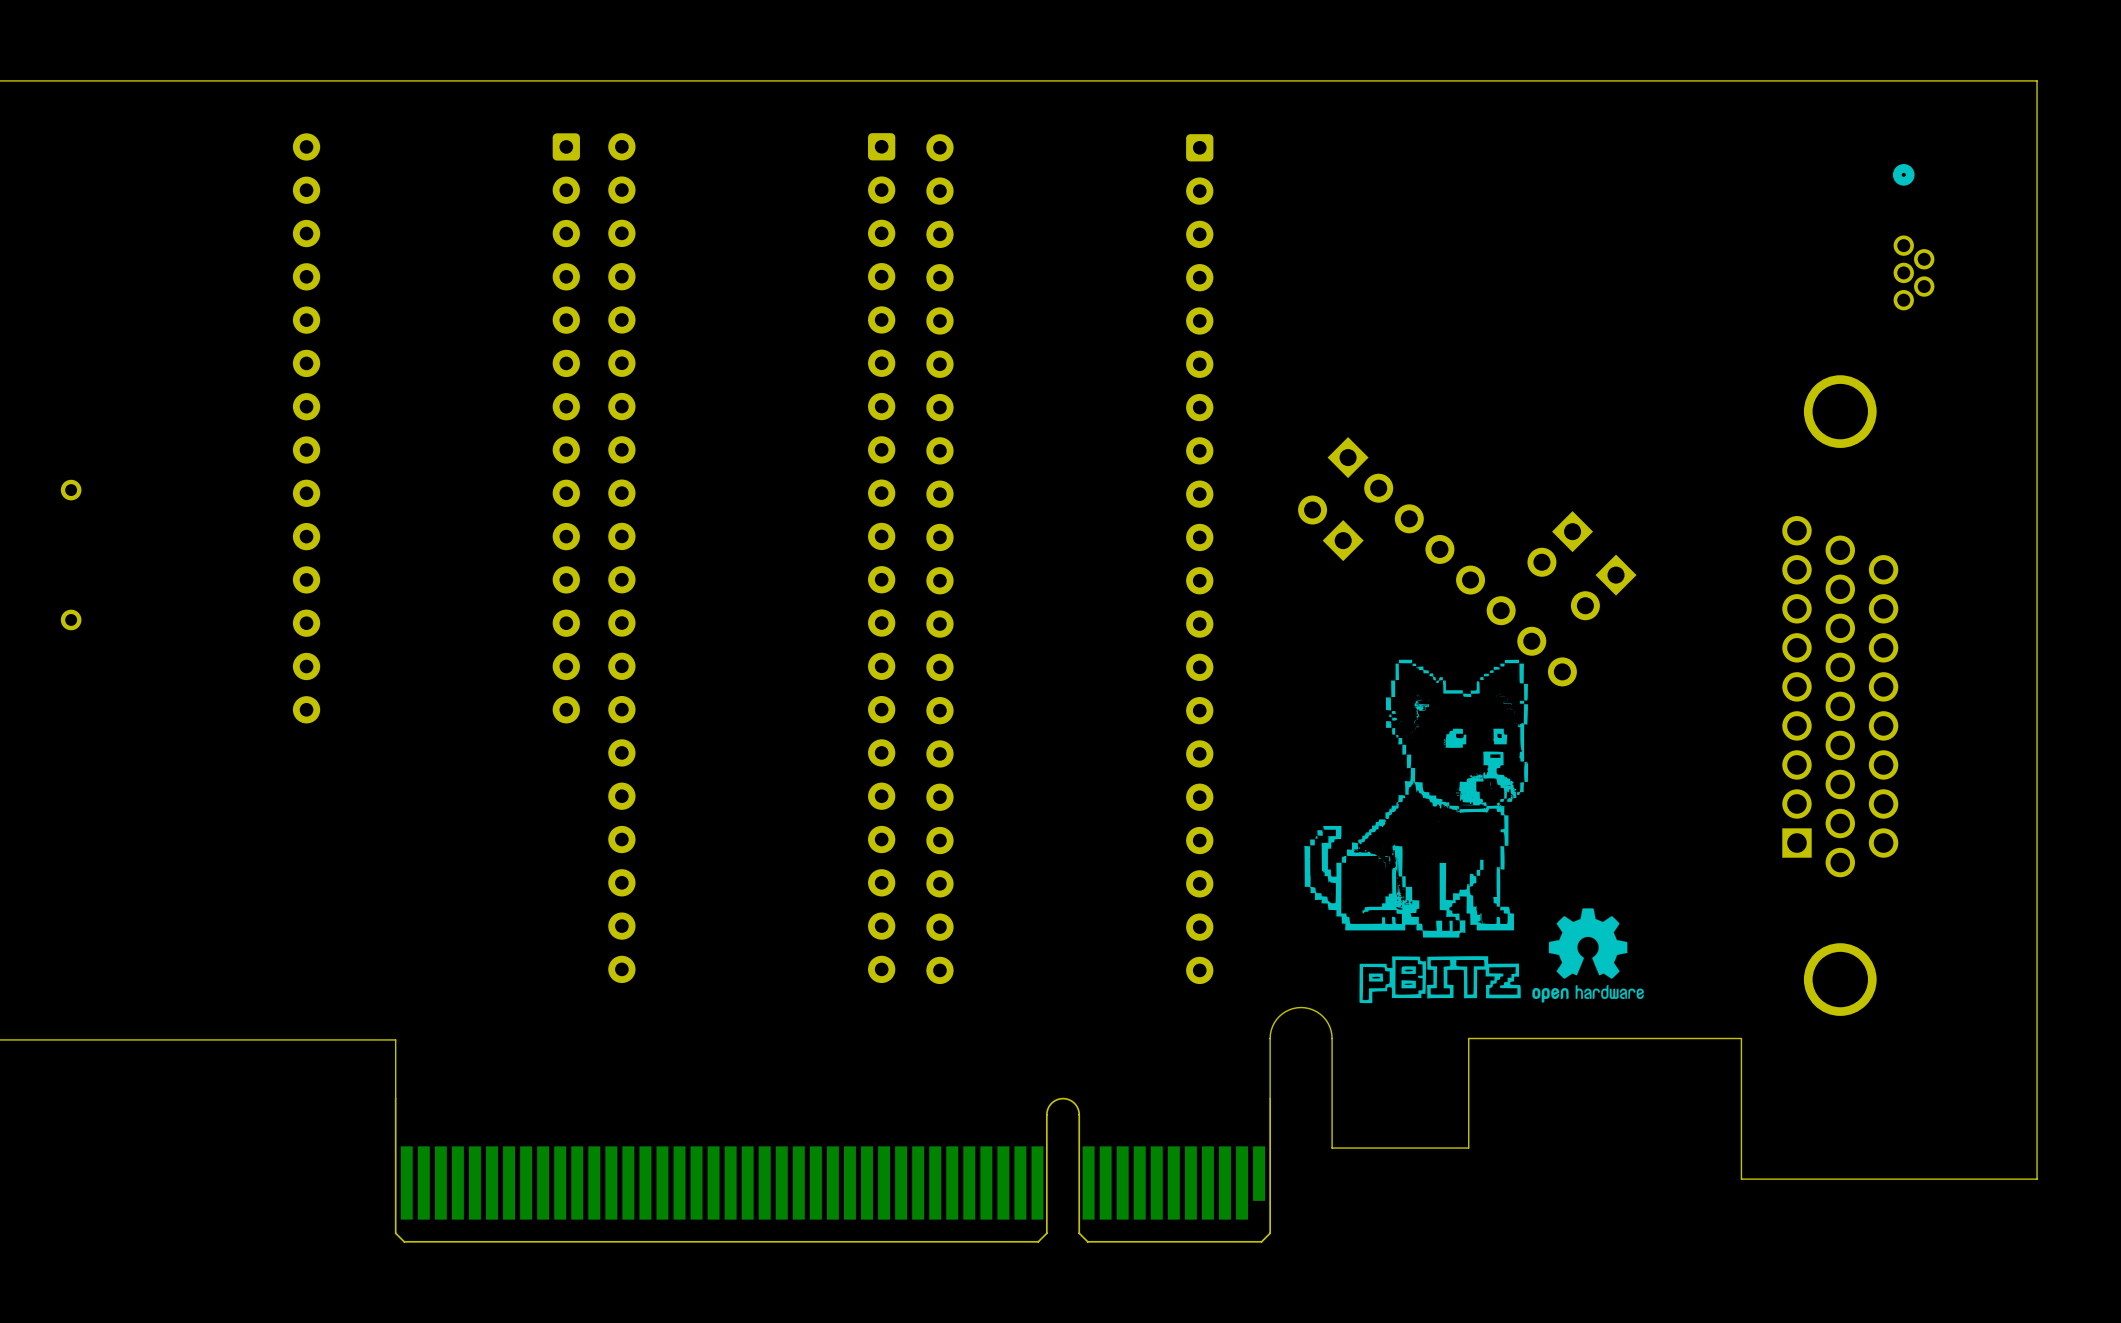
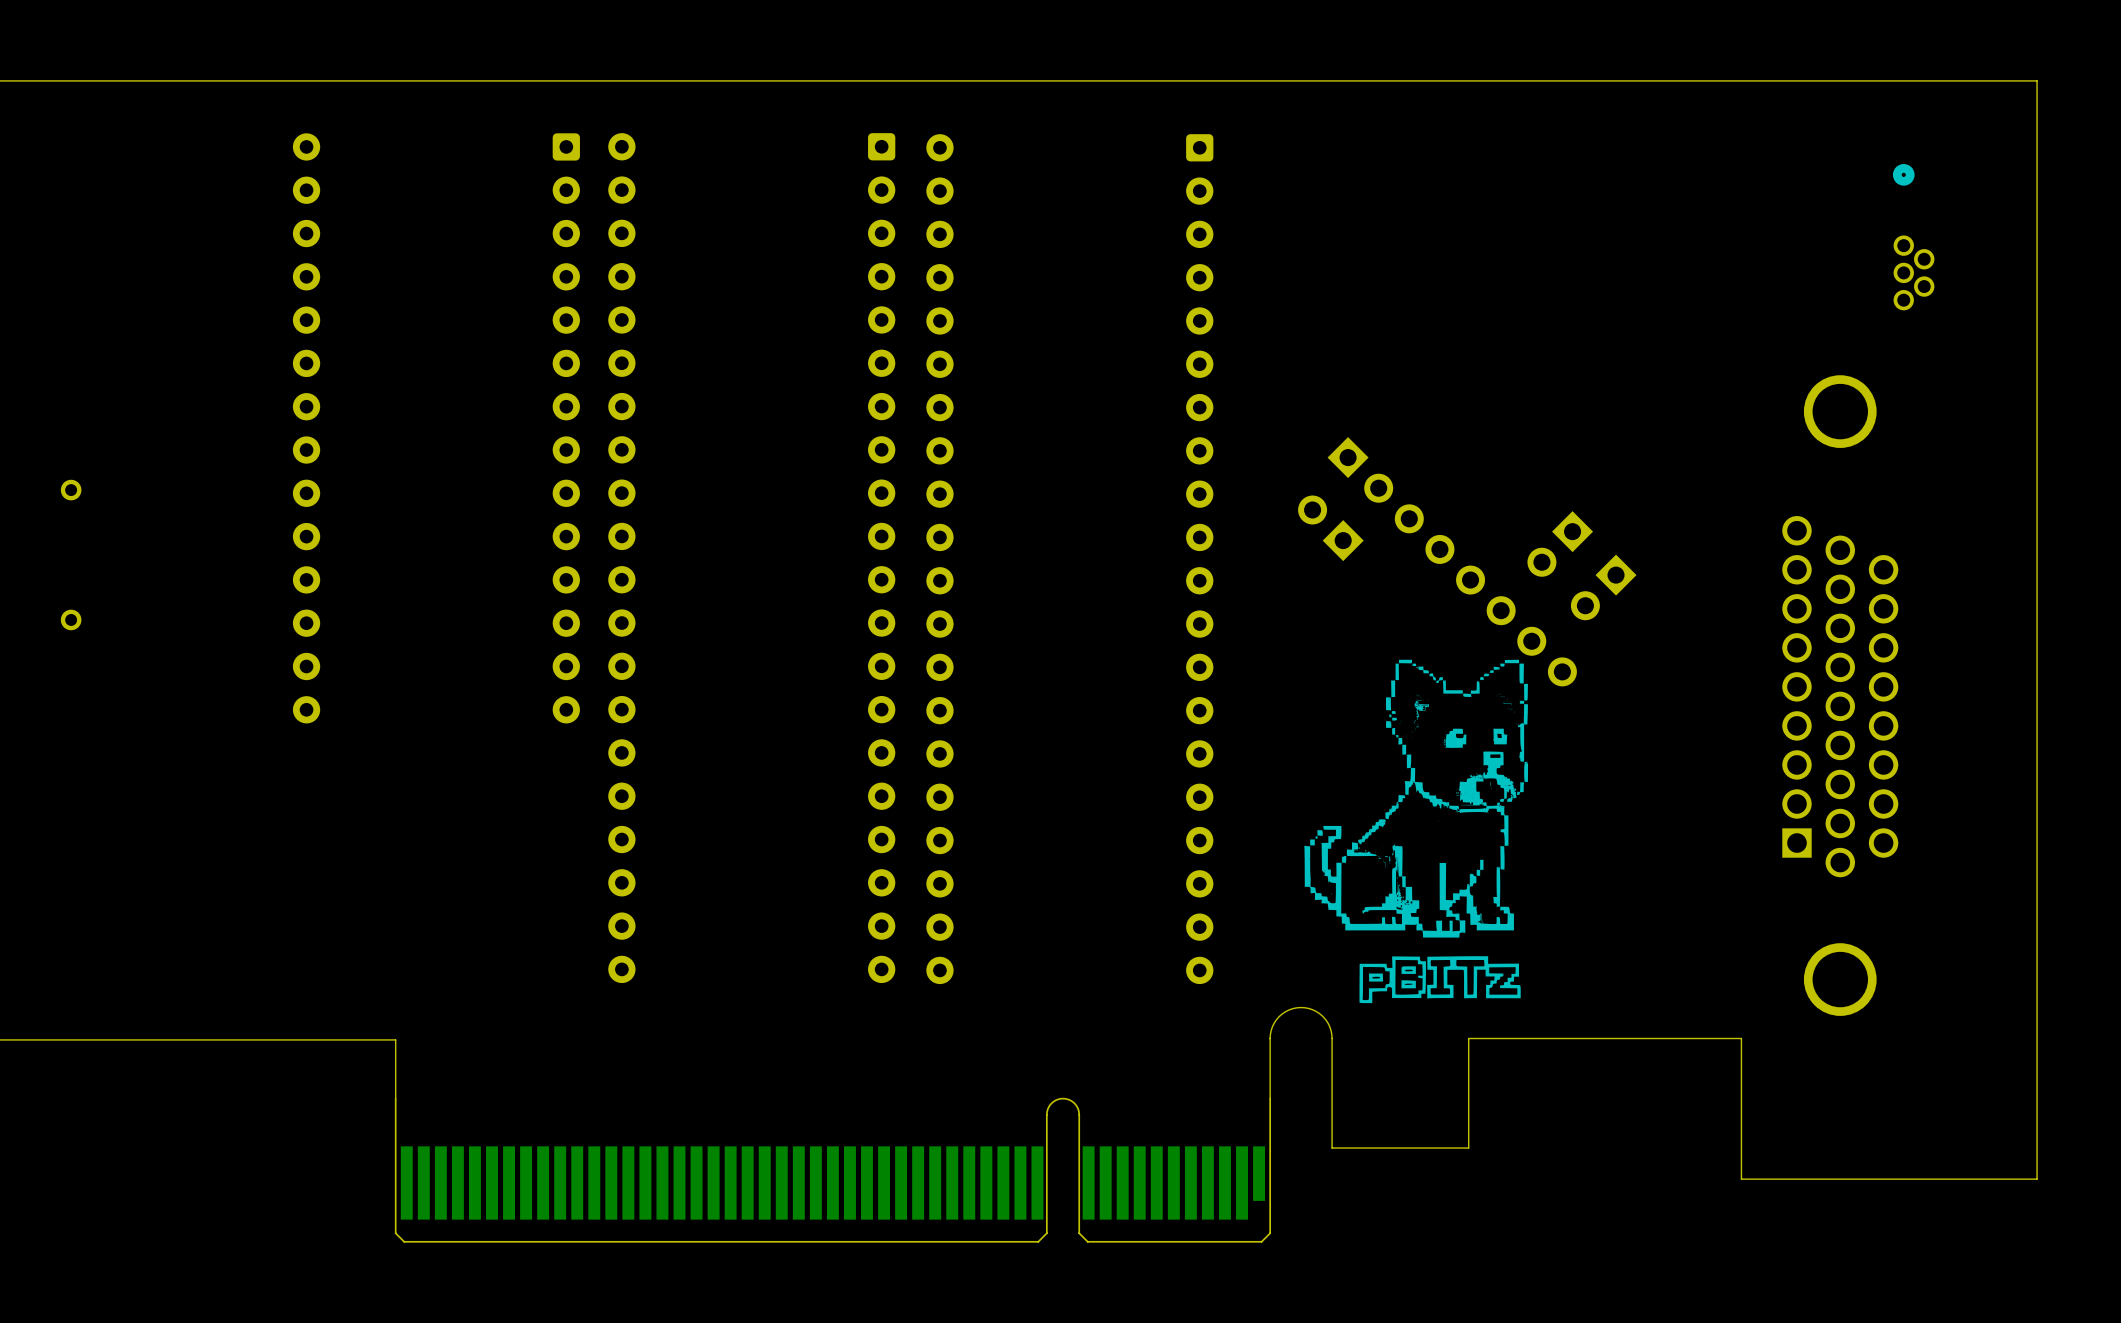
drawing: [1532, 908, 1644, 1003] -> none

